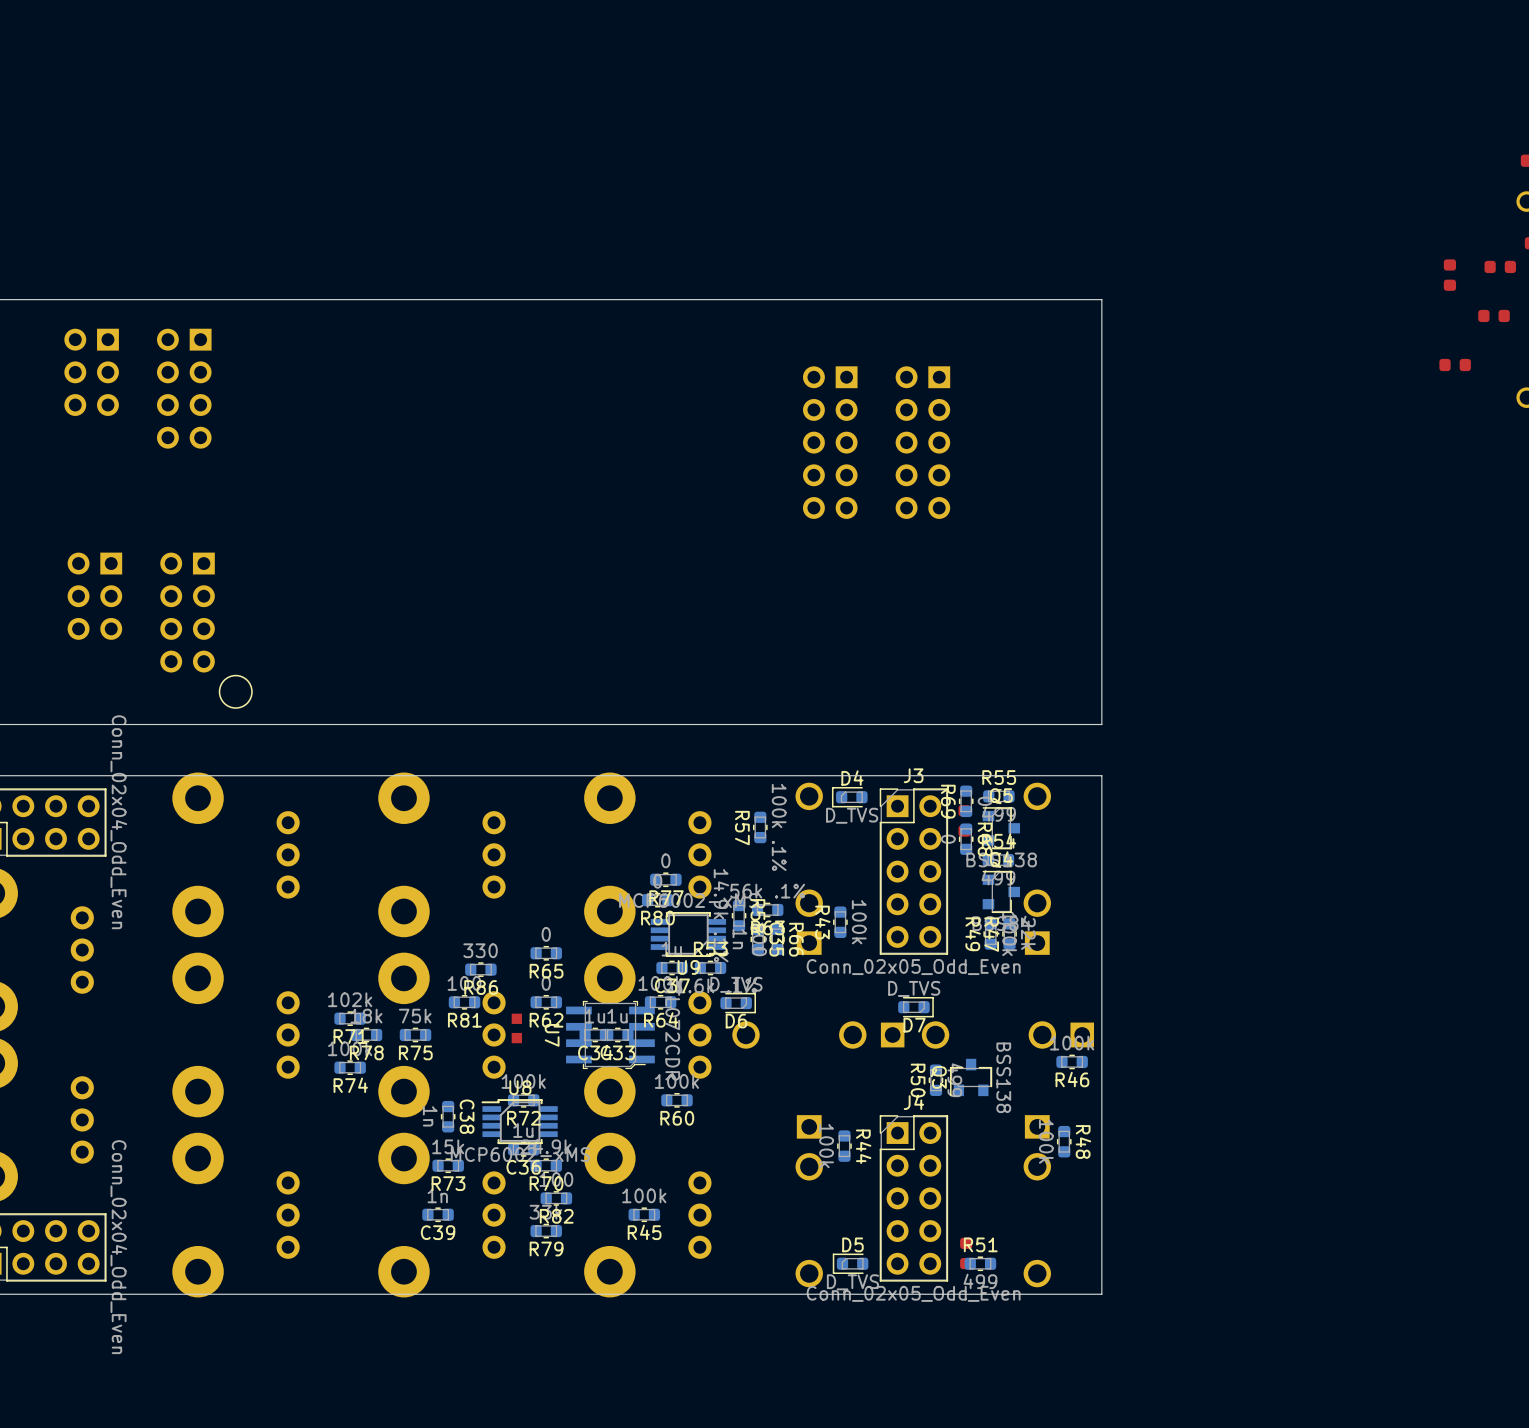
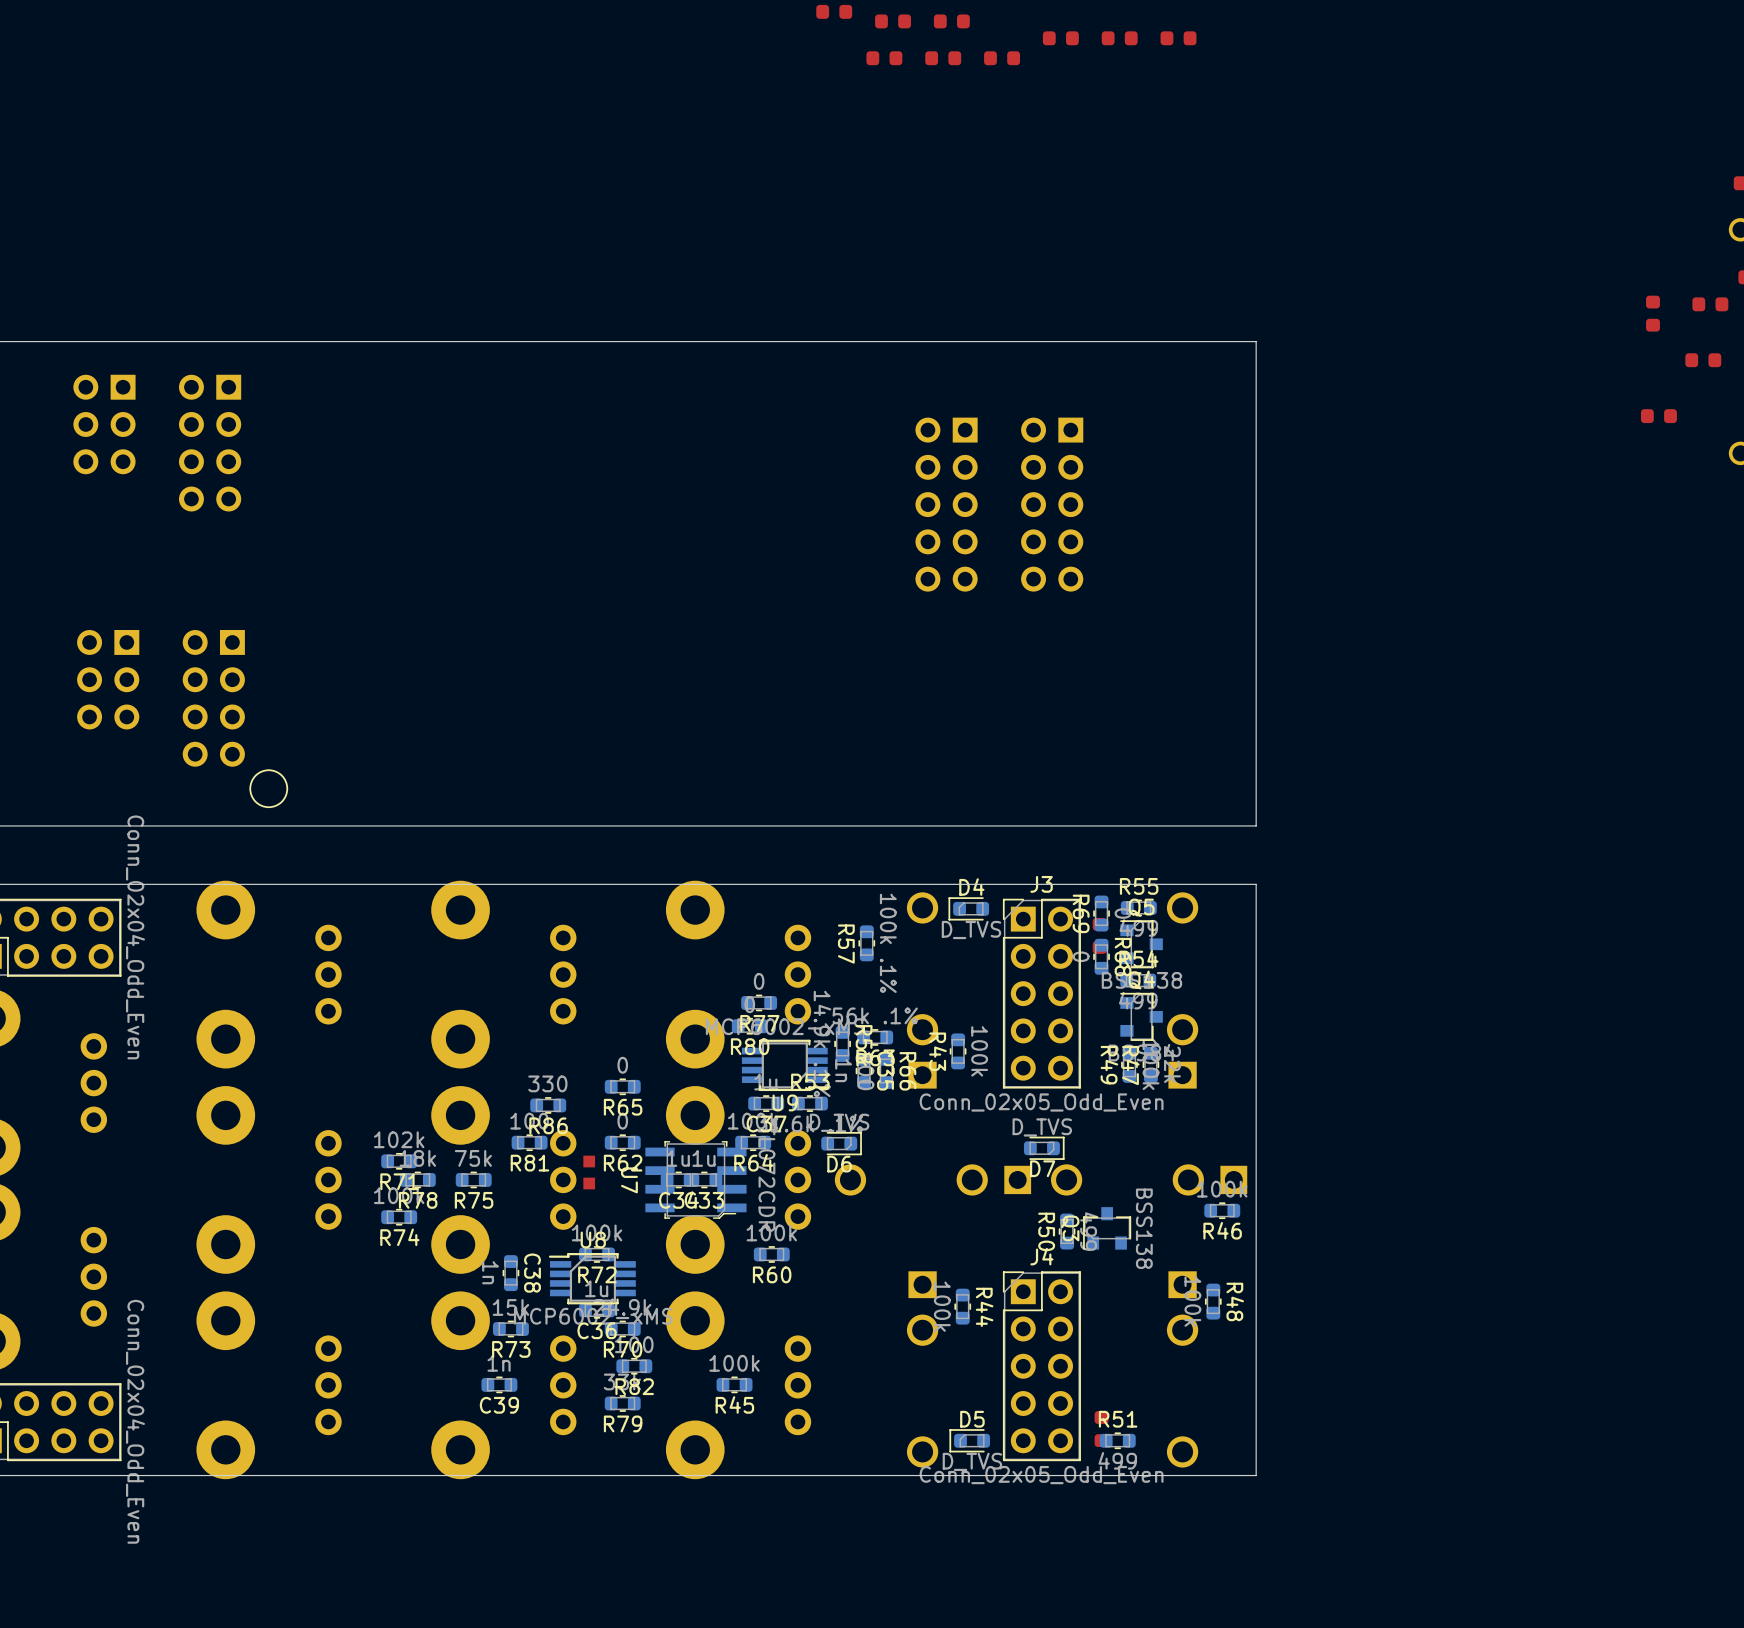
part: none -> (834, 11)
part: none -> (893, 21)
part: none -> (951, 21)
part: none -> (1060, 38)
part: none -> (1119, 38)
part: none -> (1178, 38)
part: none -> (884, 58)
part: none -> (943, 58)
part: none -> (1002, 58)

